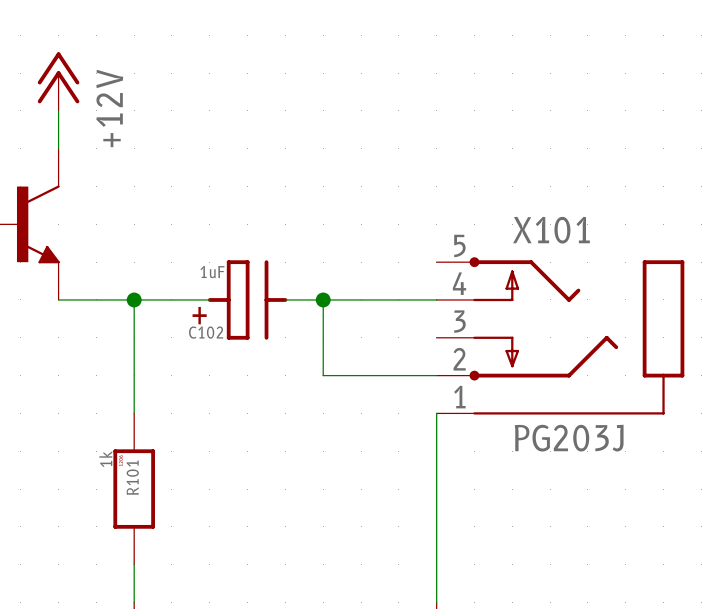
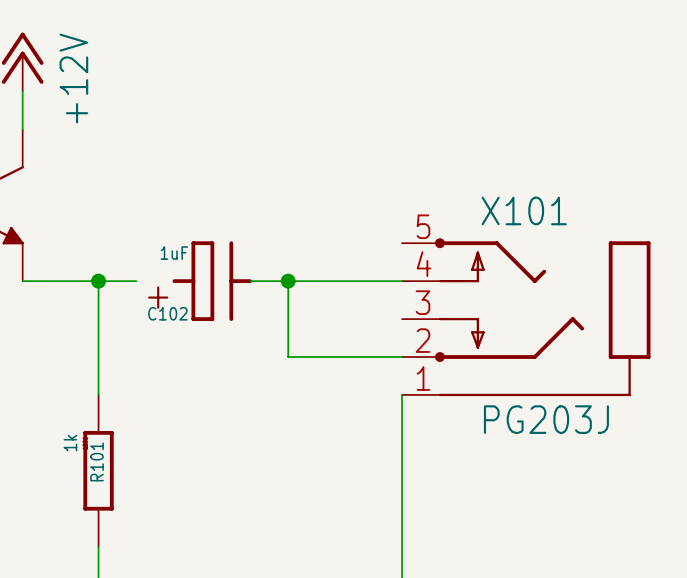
wire: (171, 299) (209, 299) -> none
R101 symbol: [113, 413, 155, 565] -> [83, 394, 114, 547]

